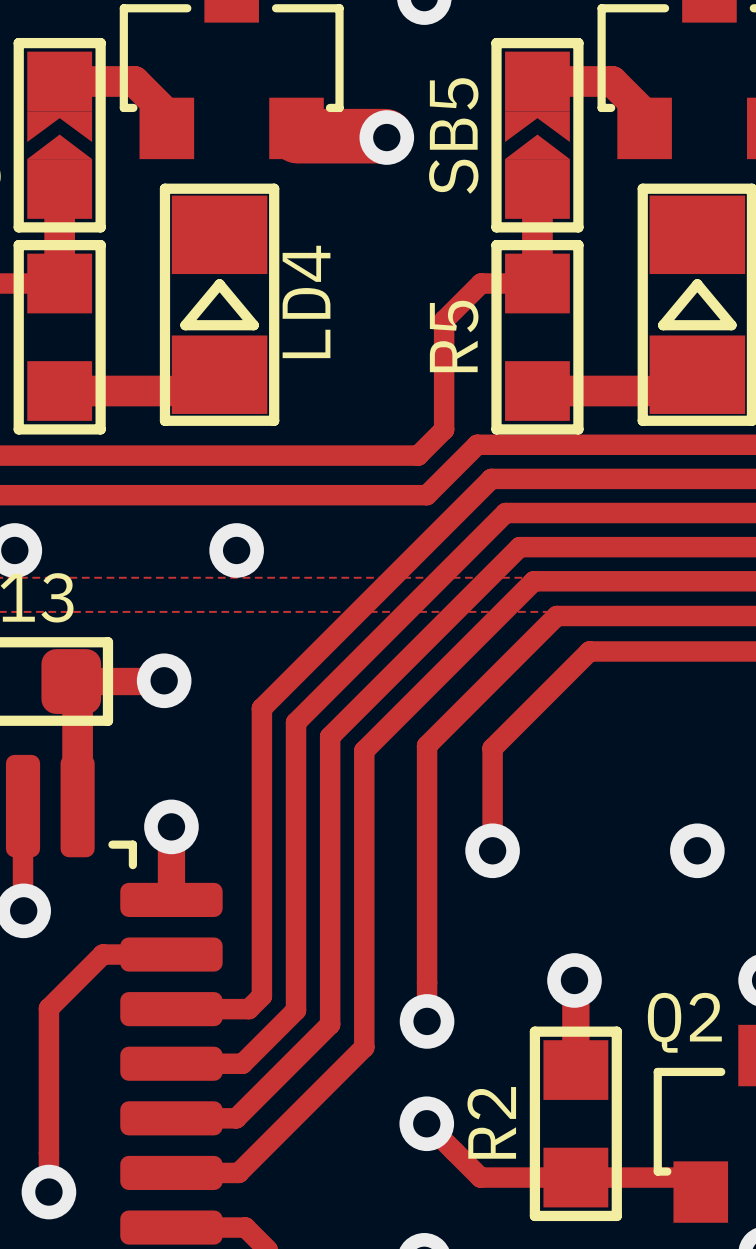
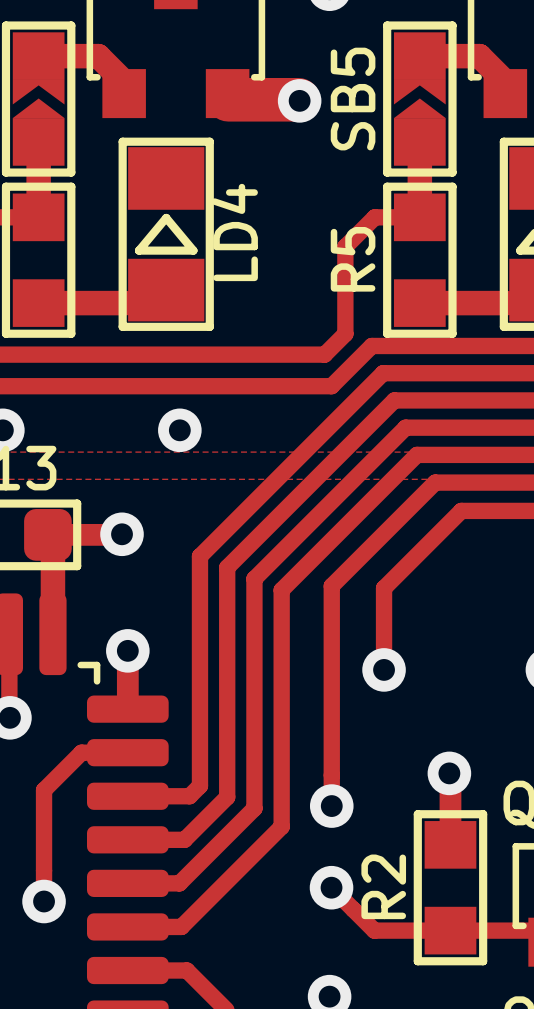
track: (113, 954) (102, 954) (48, 1008) (48, 1192) -> (81, 752) (44, 790) (44, 901)
via position: (48, 1192) -> (44, 901)

